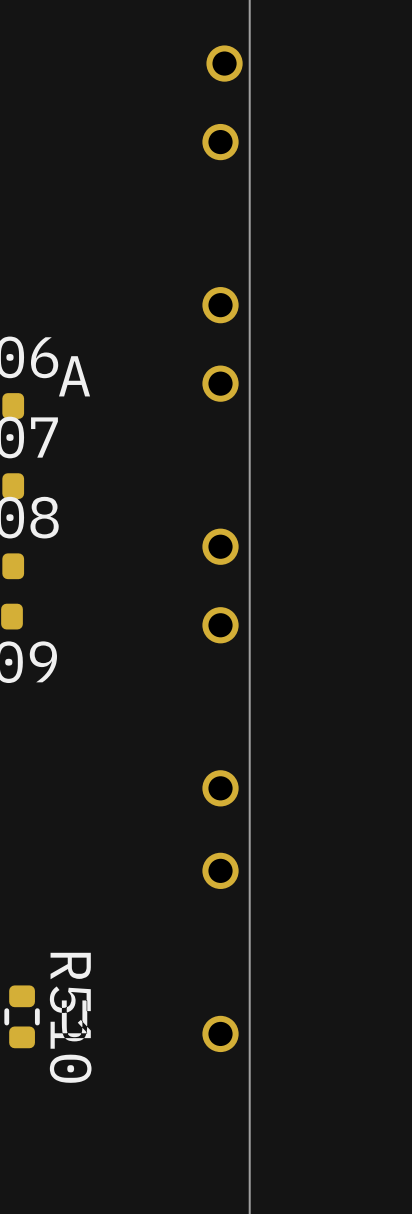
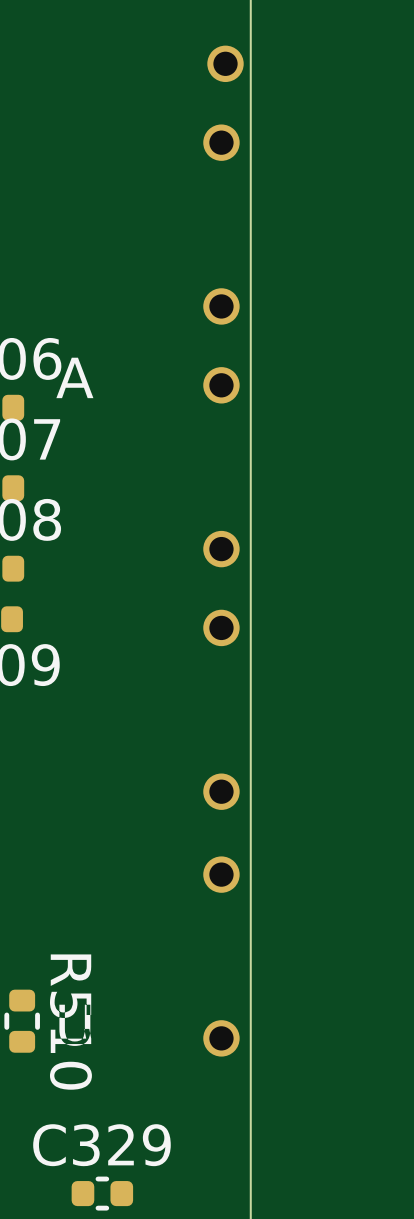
C329: none -> (102, 1193)

